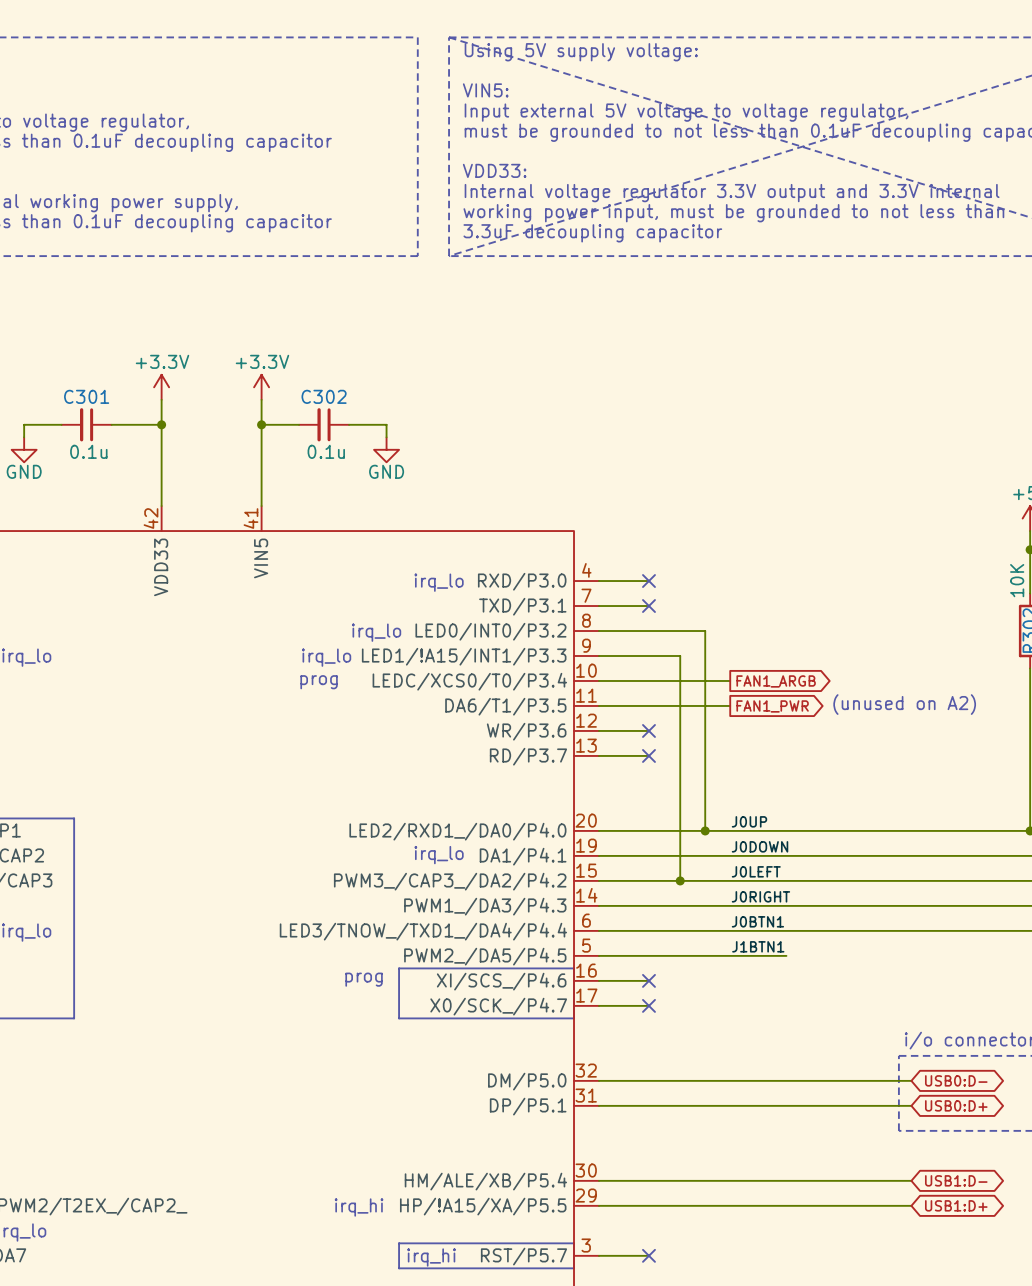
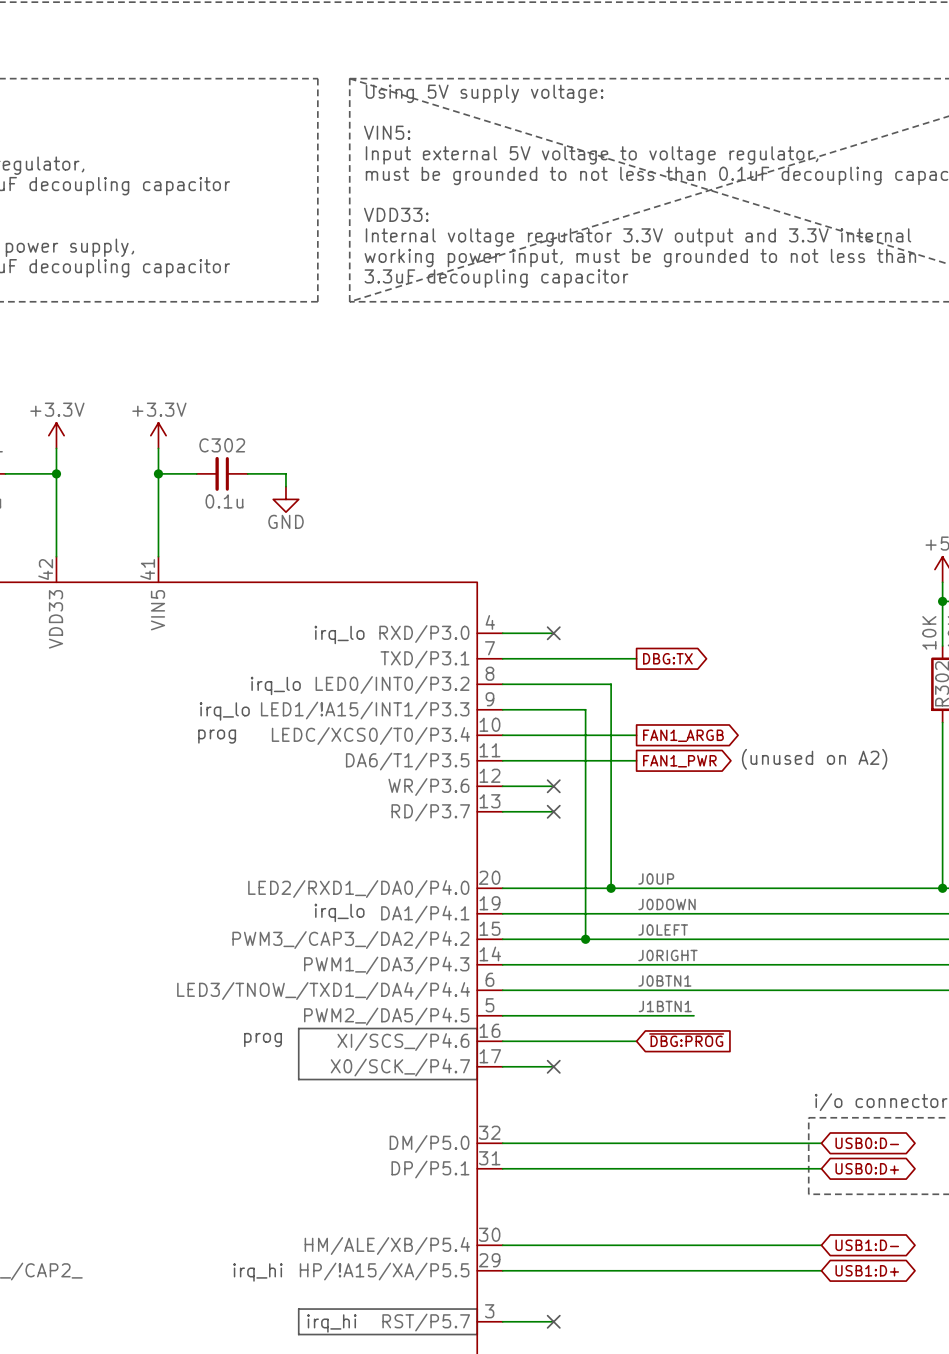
wire: none -> (553, 658) (636, 658)
no-connect mark: (648, 606) -> none
global label: none -> DBG:TX (667, 658)
global label: none -> ~{DBG:PROG} (686, 1040)
wire: none -> (553, 1041) (636, 1041)
no-connect mark: (648, 980) -> none

